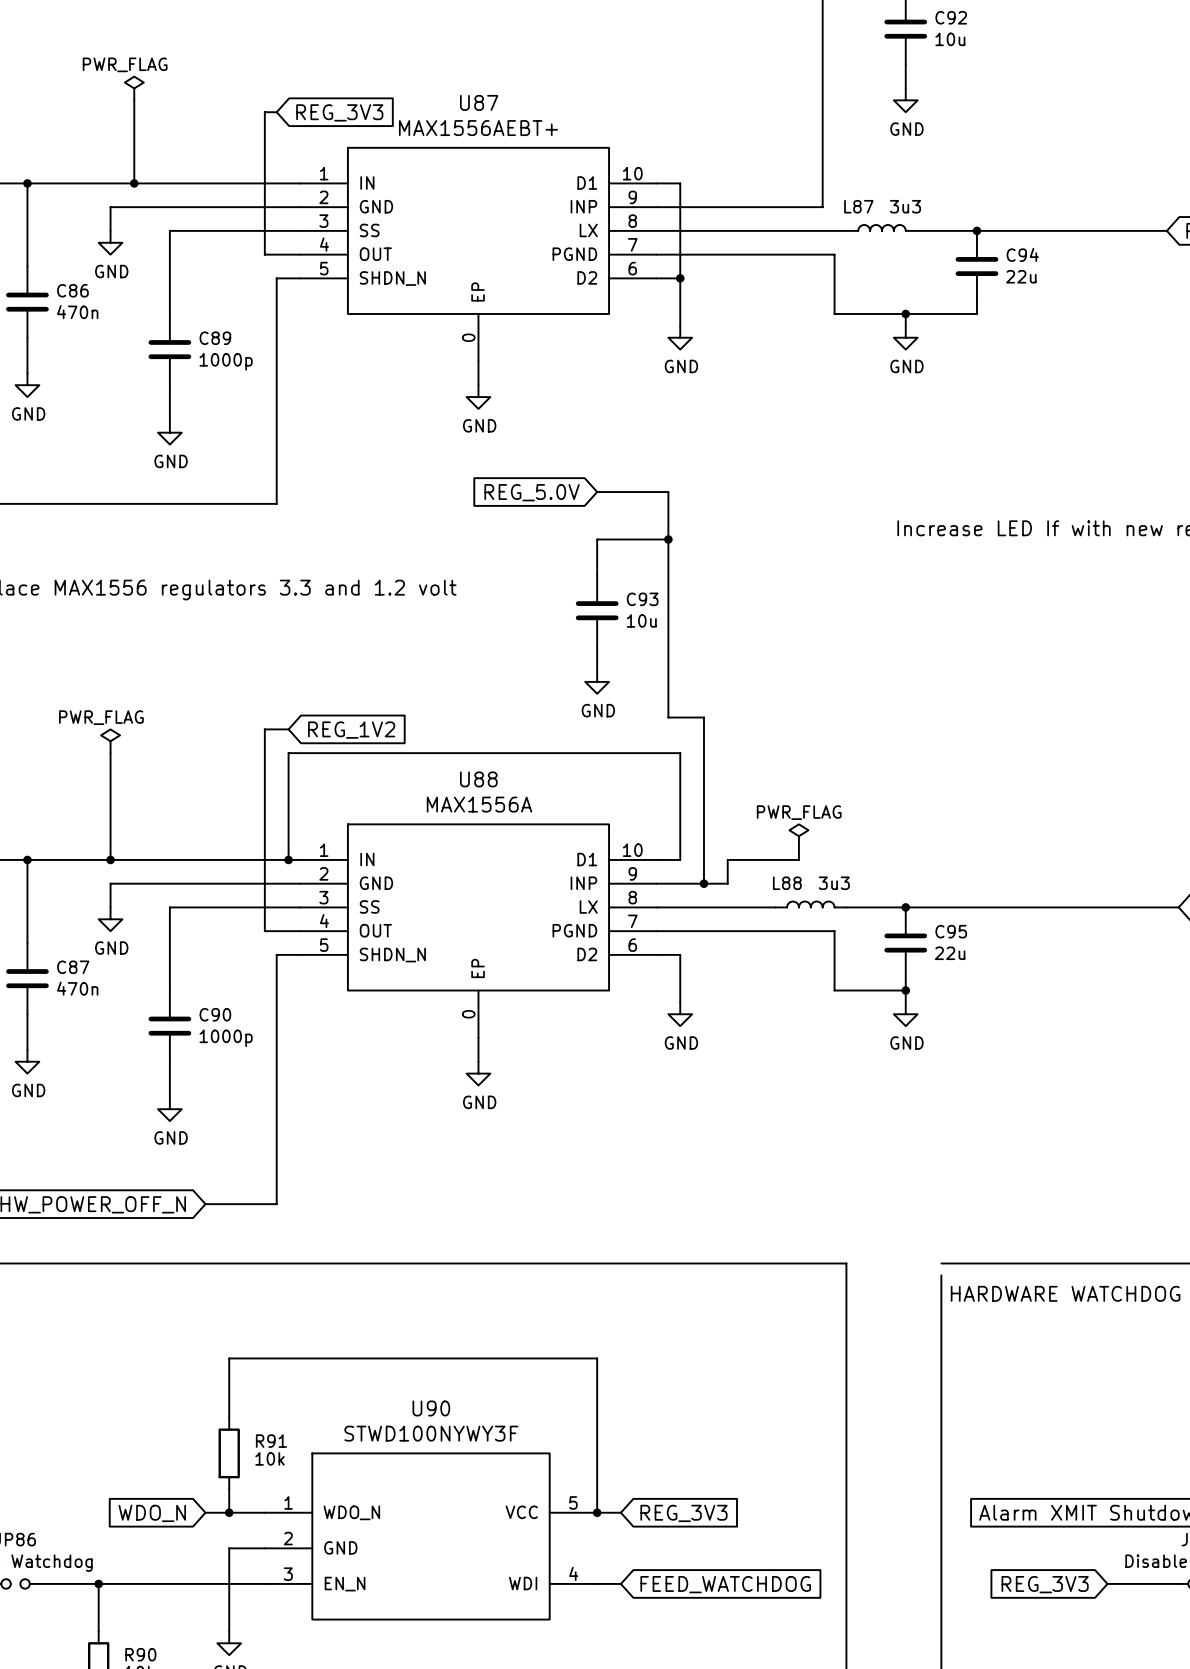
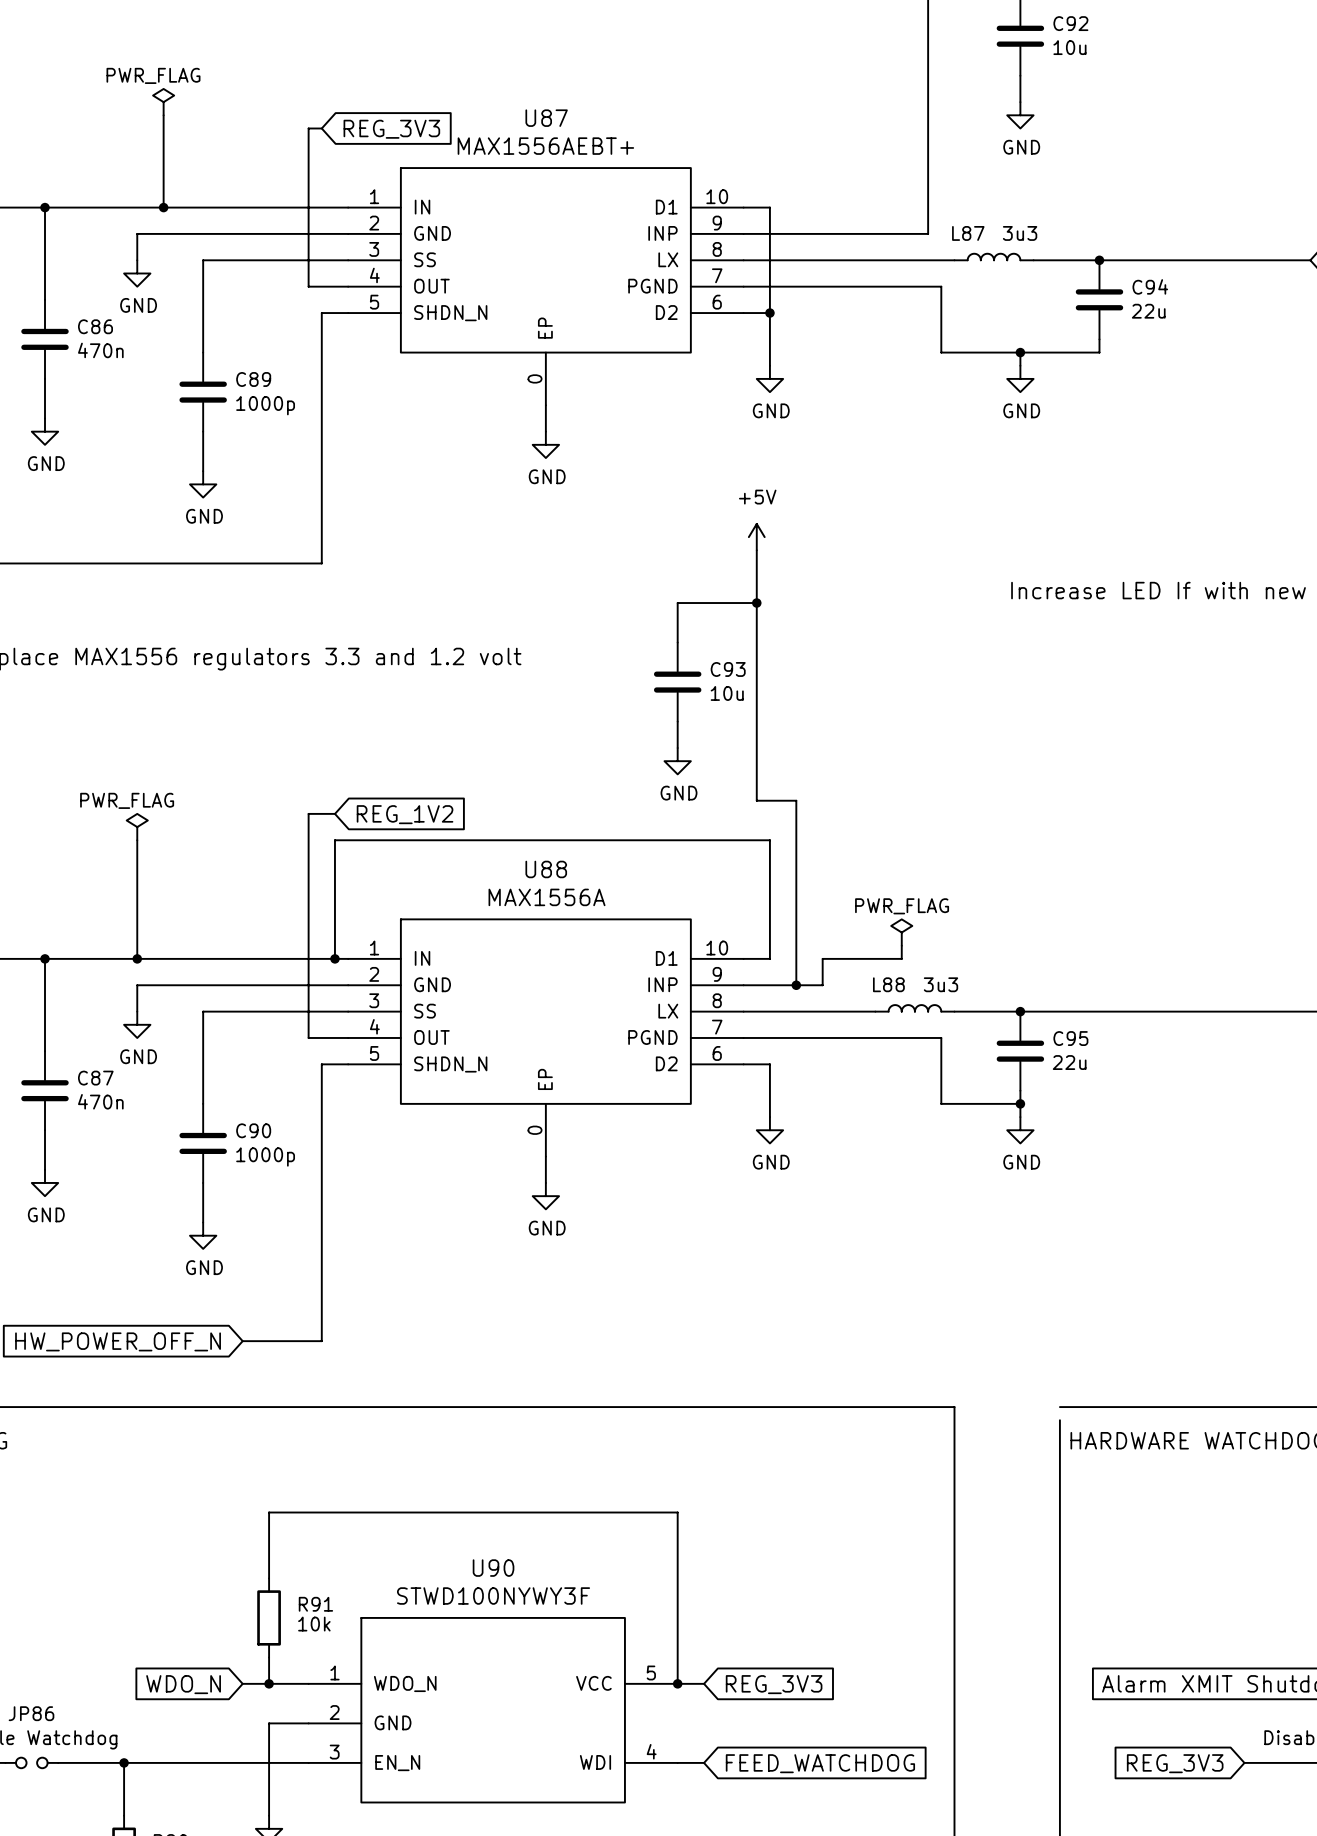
power symbol: none -> +5V (756, 537)
global label: REG_5.0V (532, 492) -> none
wire: (597, 492) (668, 492) -> none

